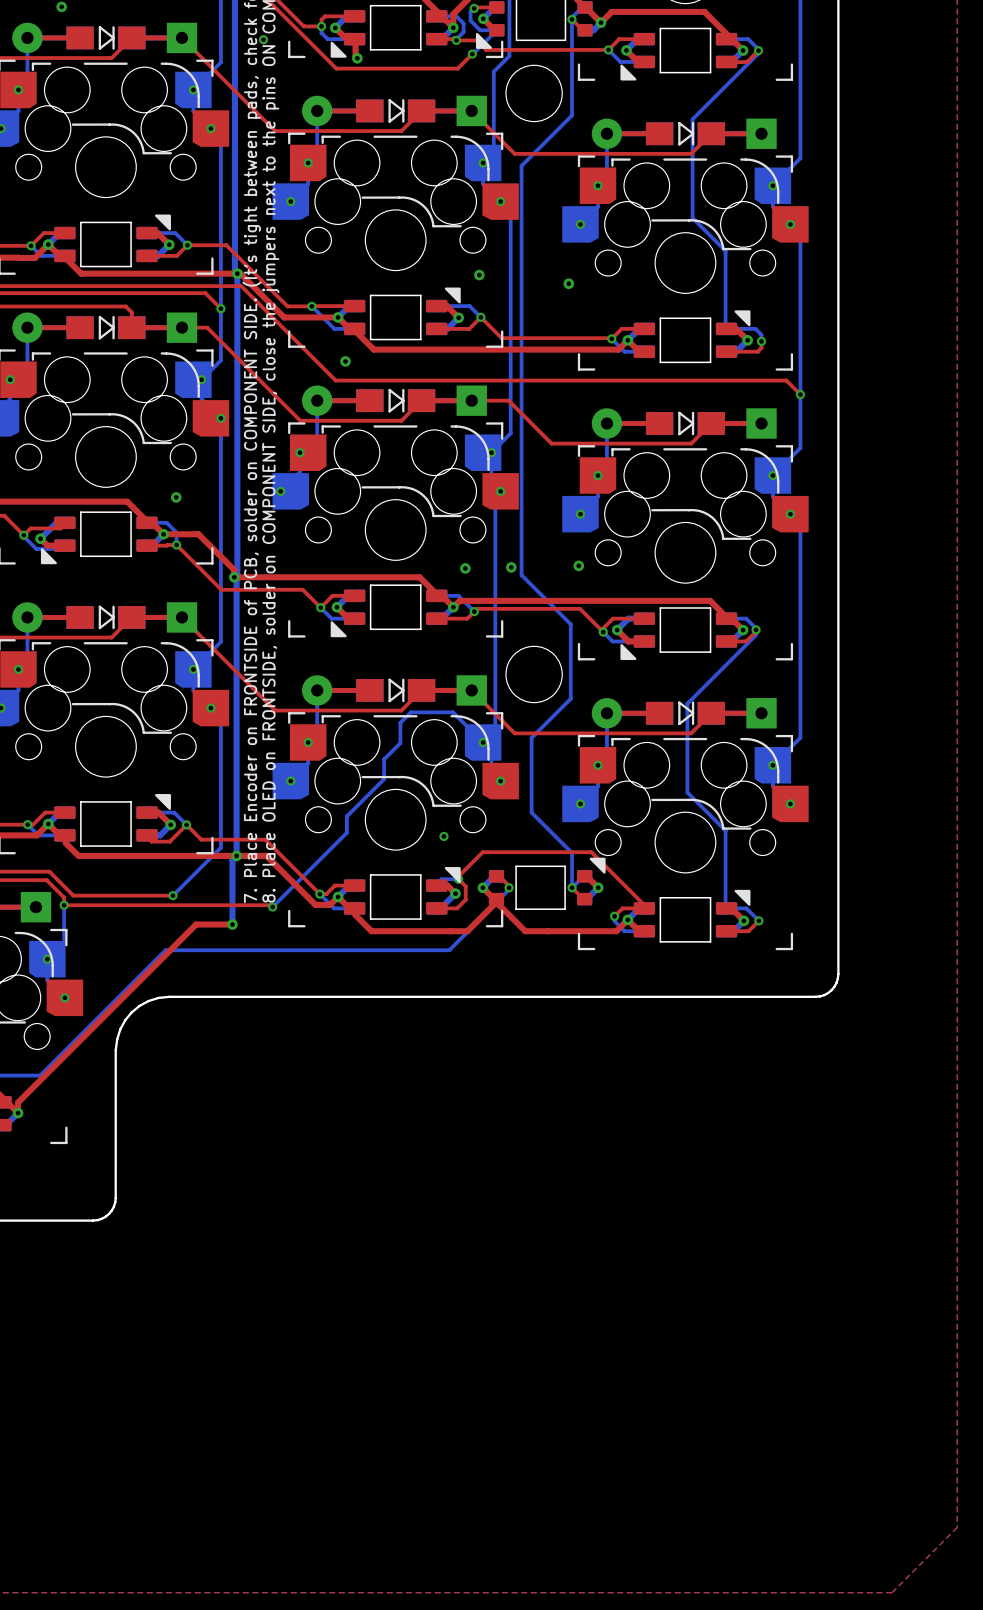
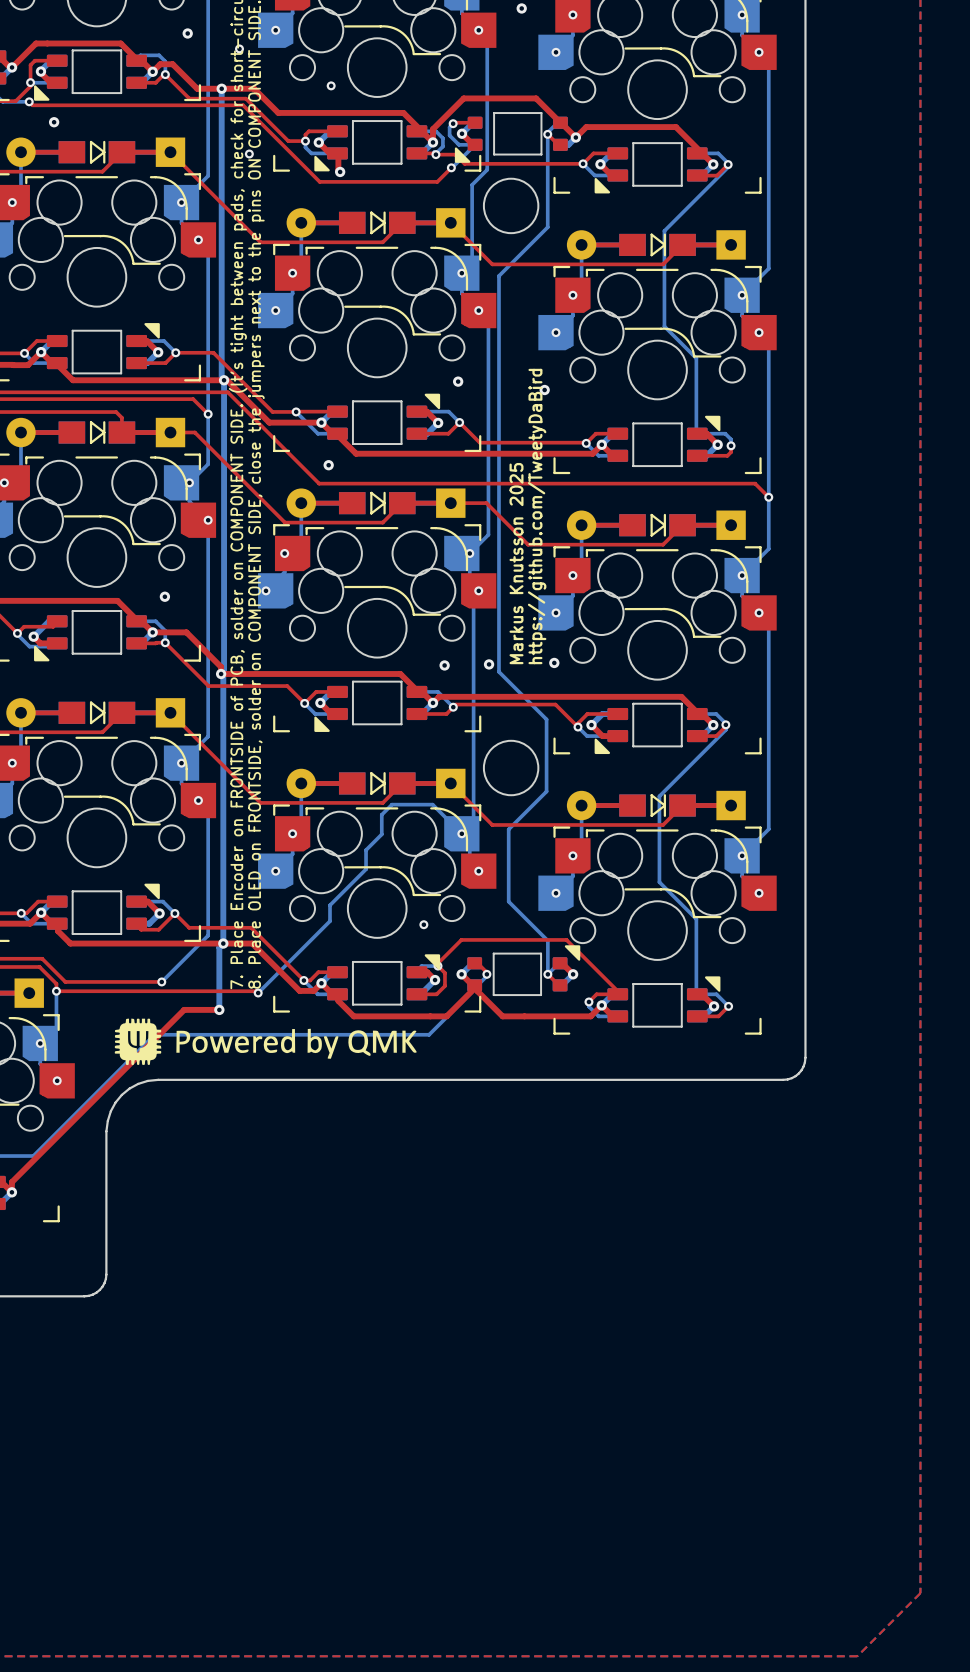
text: none -> https://github.com/TweetyDaBird (537, 516)
text: none -> Markus Knutsson 2025 (516, 563)
drawing: none -> [114, 1018, 417, 1066]

